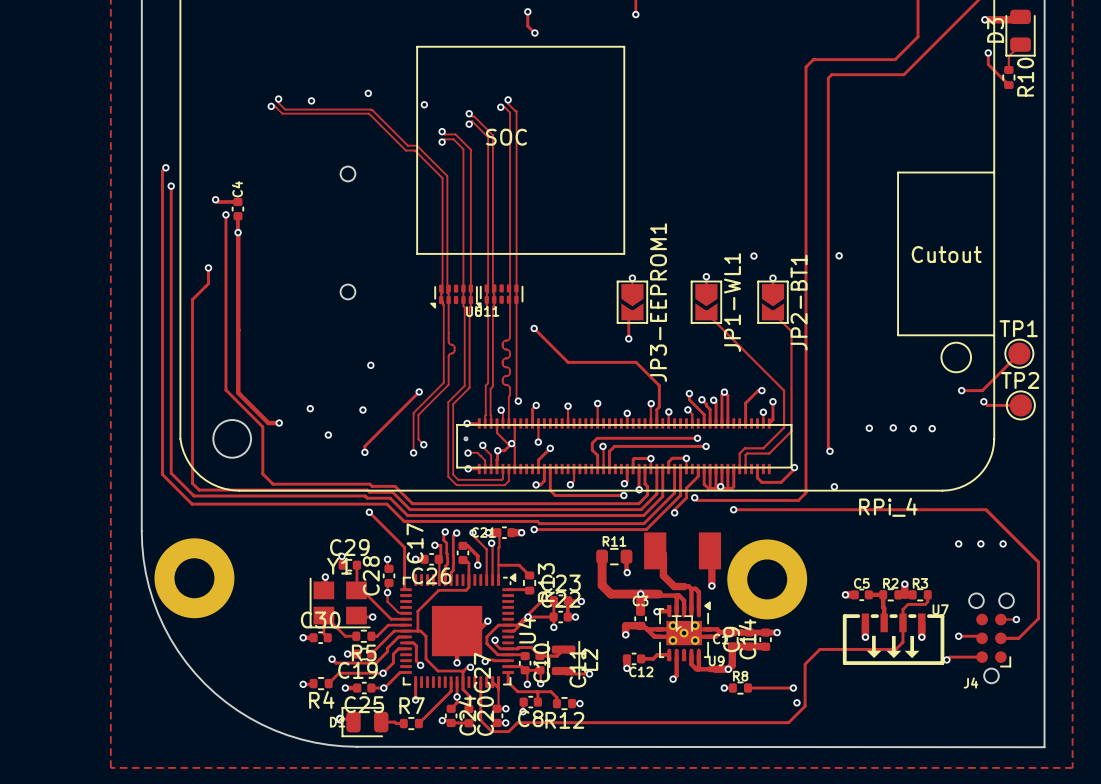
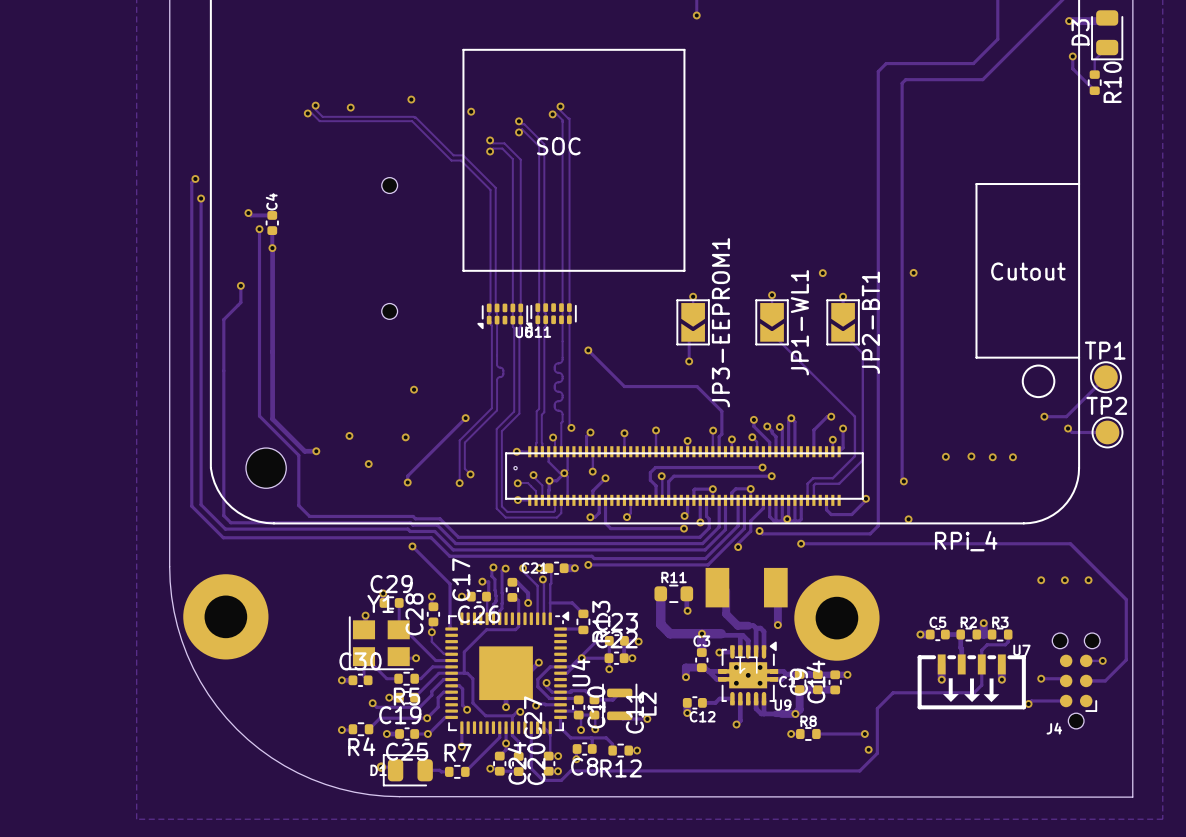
track: (527, 11) (527, 26) (534, 32) -> none
via: (527, 11) -> none
via: (534, 32) -> none

